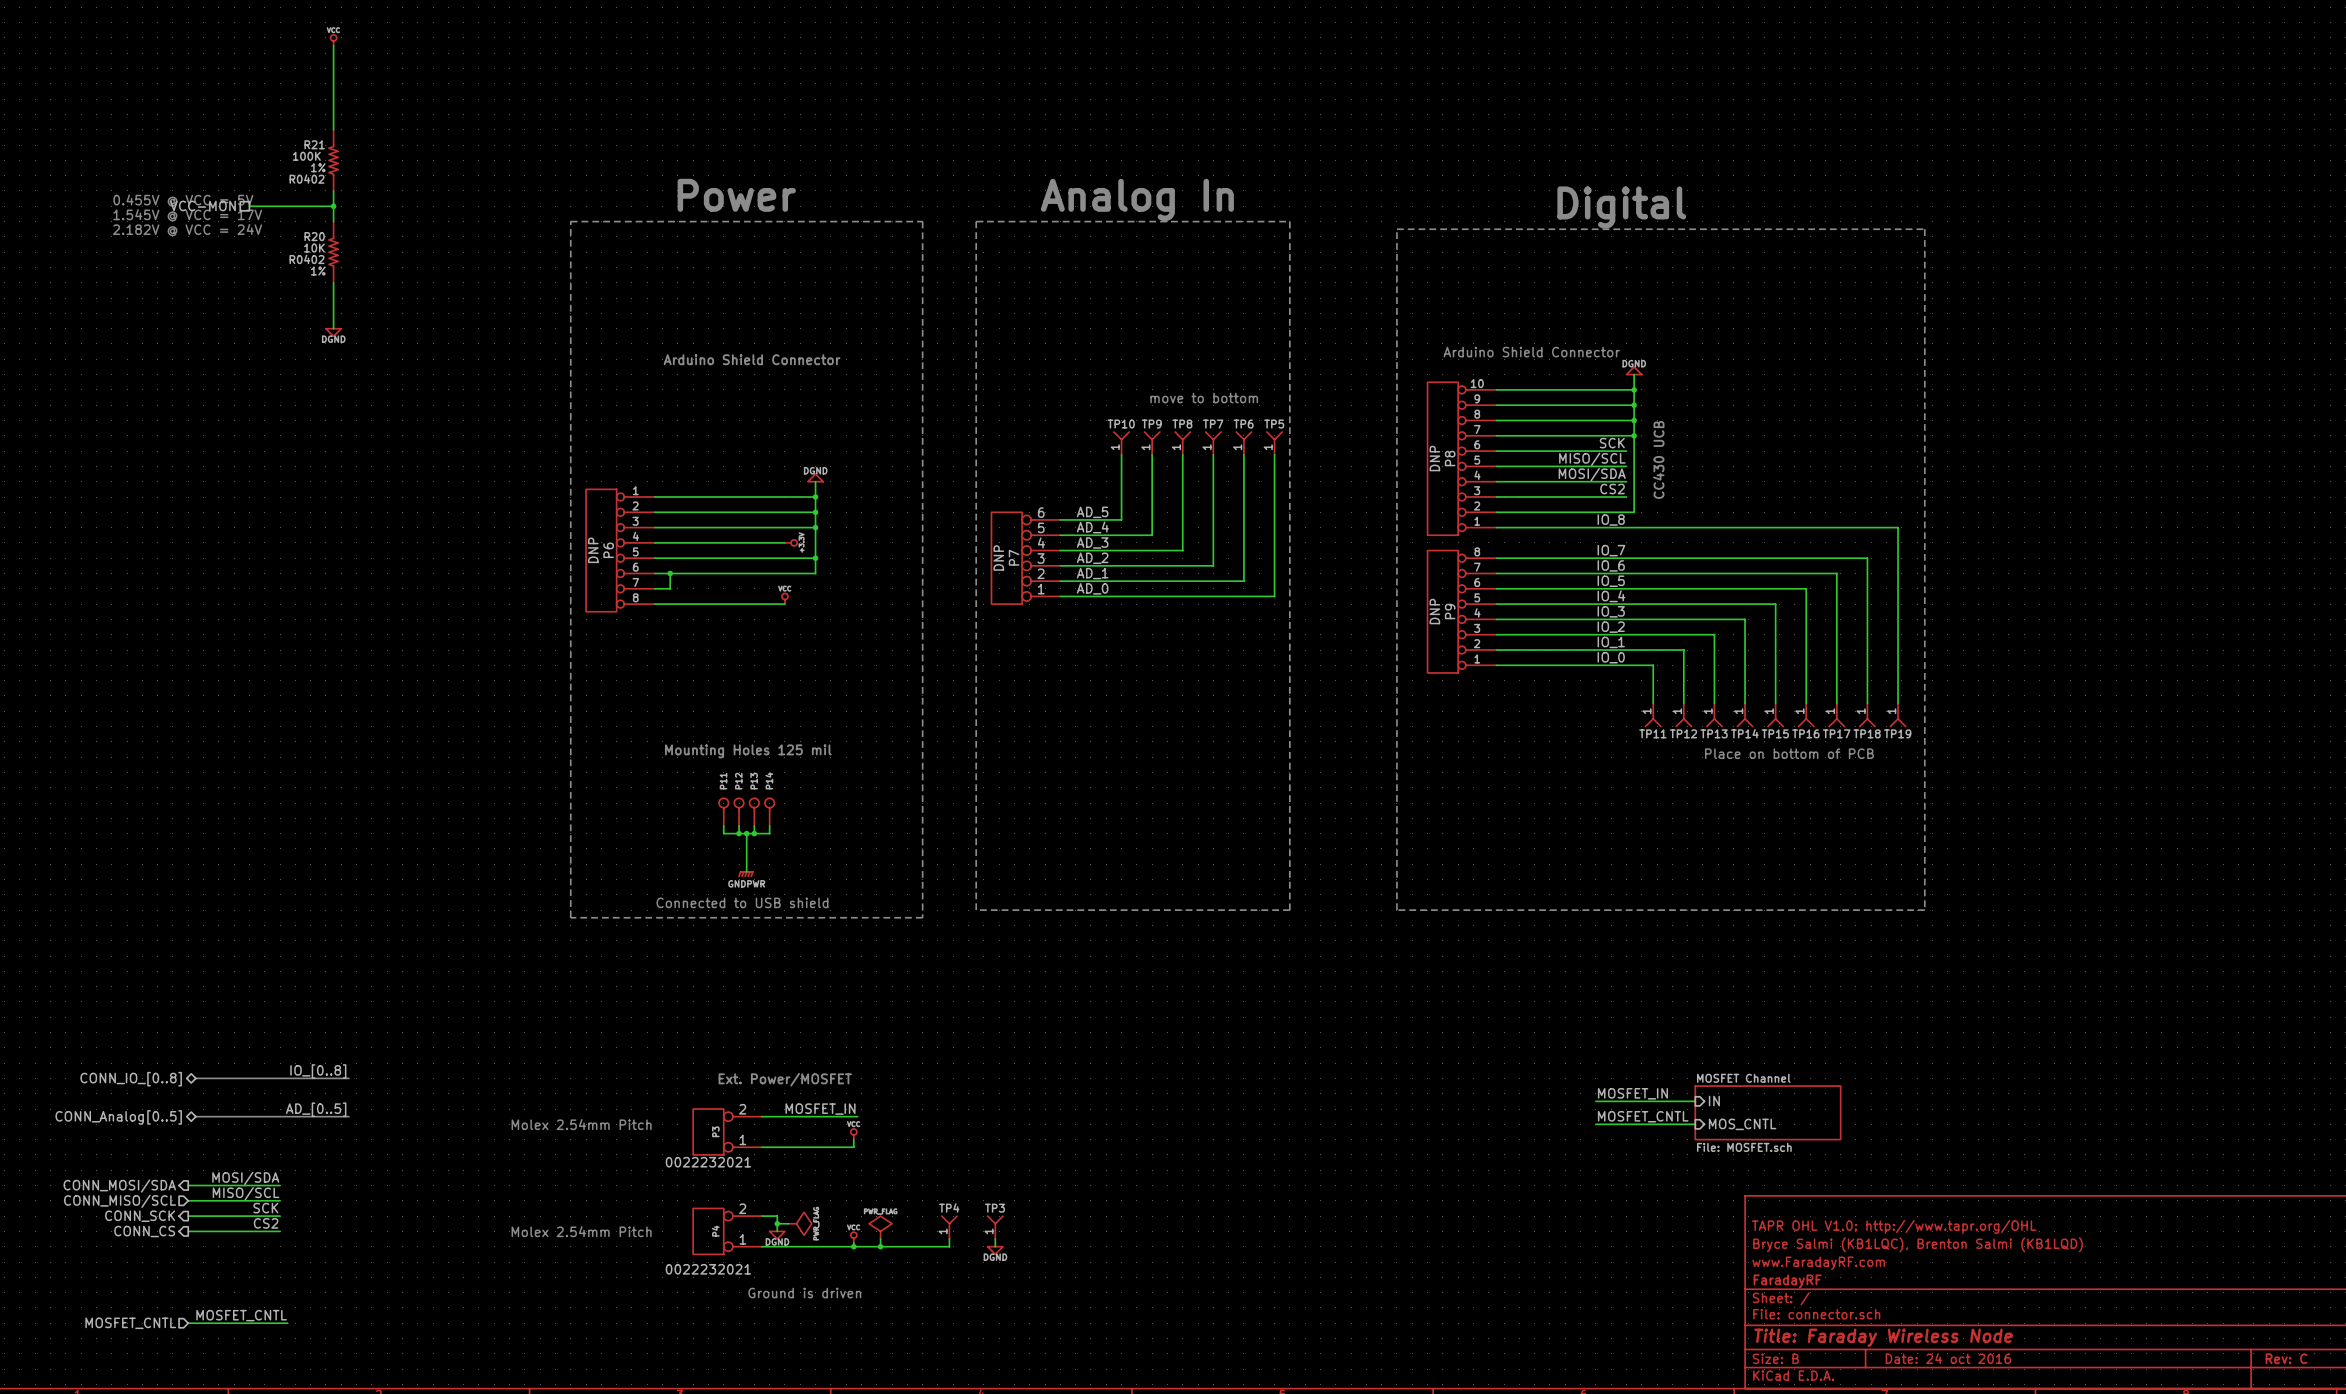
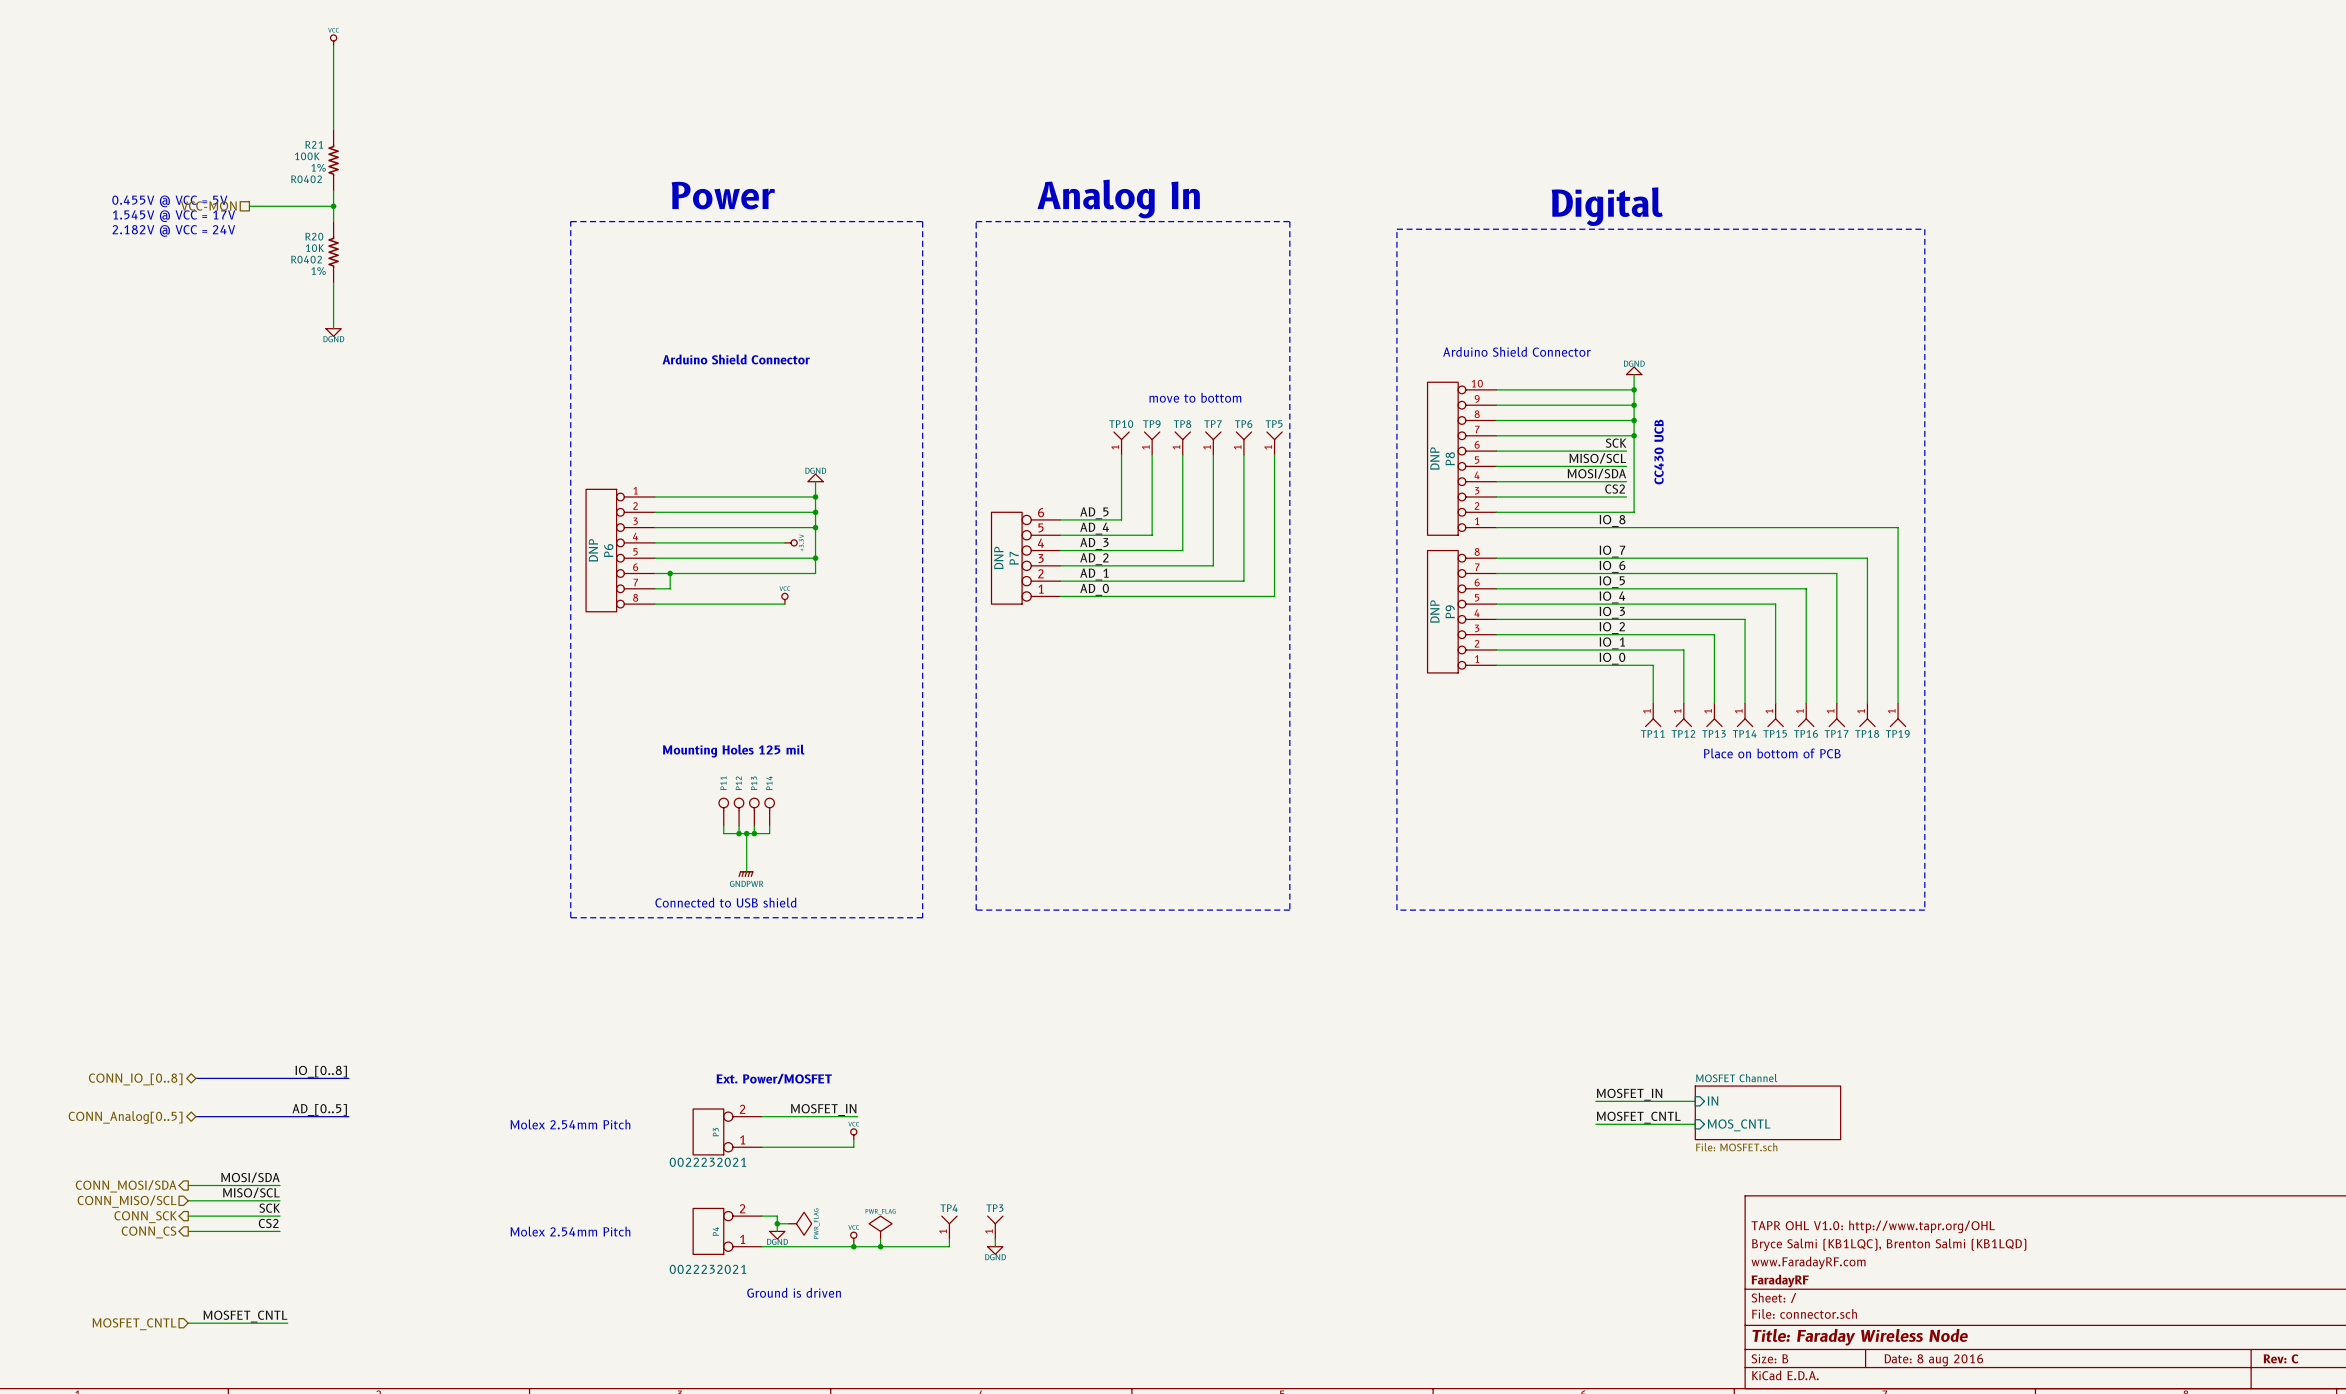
title block: Date: 24 oct 2016 (1948, 1358) -> Date: 8 aug 2016 (1933, 1360)

